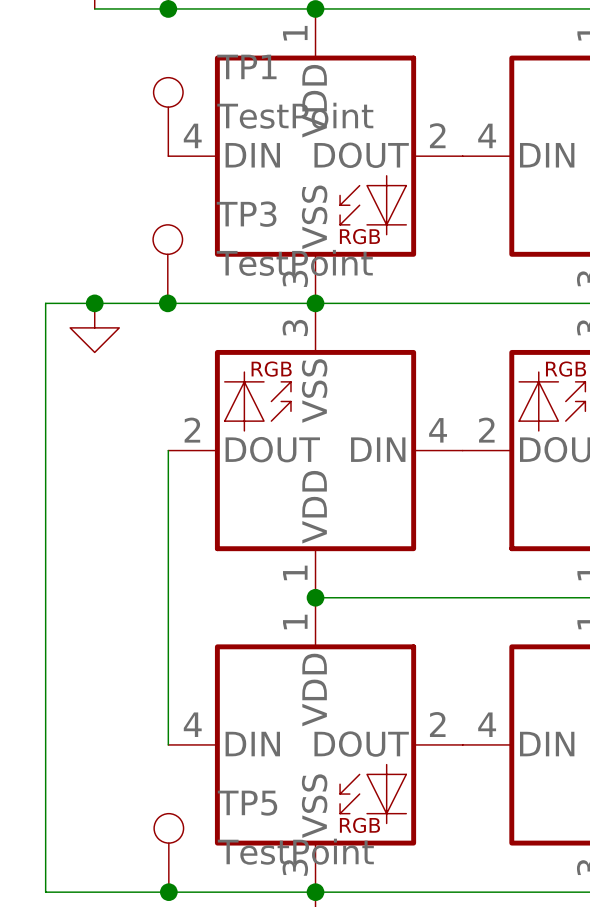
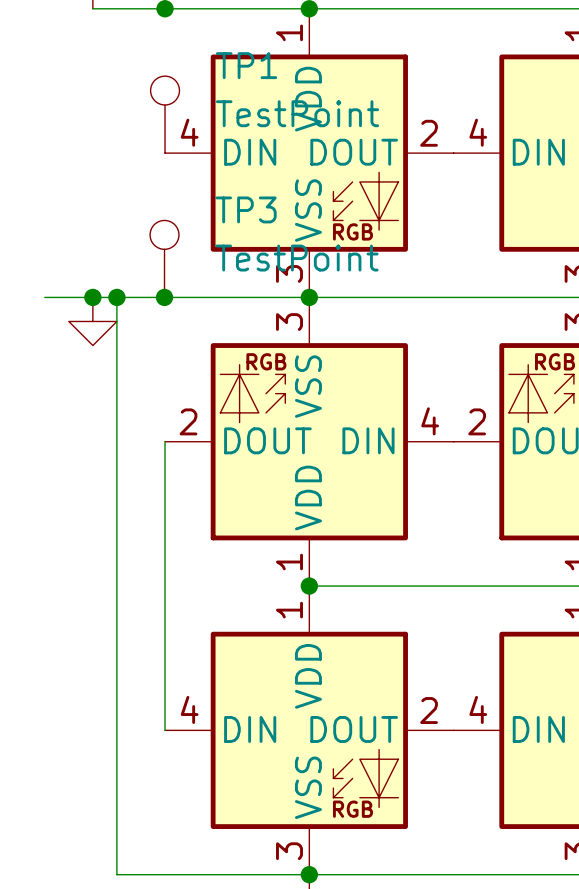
wire: (45, 303) (45, 892) (119, 892) -> (116, 297) (116, 874)
junction: none -> (116, 297)
TP5: TestPoint (168, 852) -> none
junction: (168, 892) -> none

